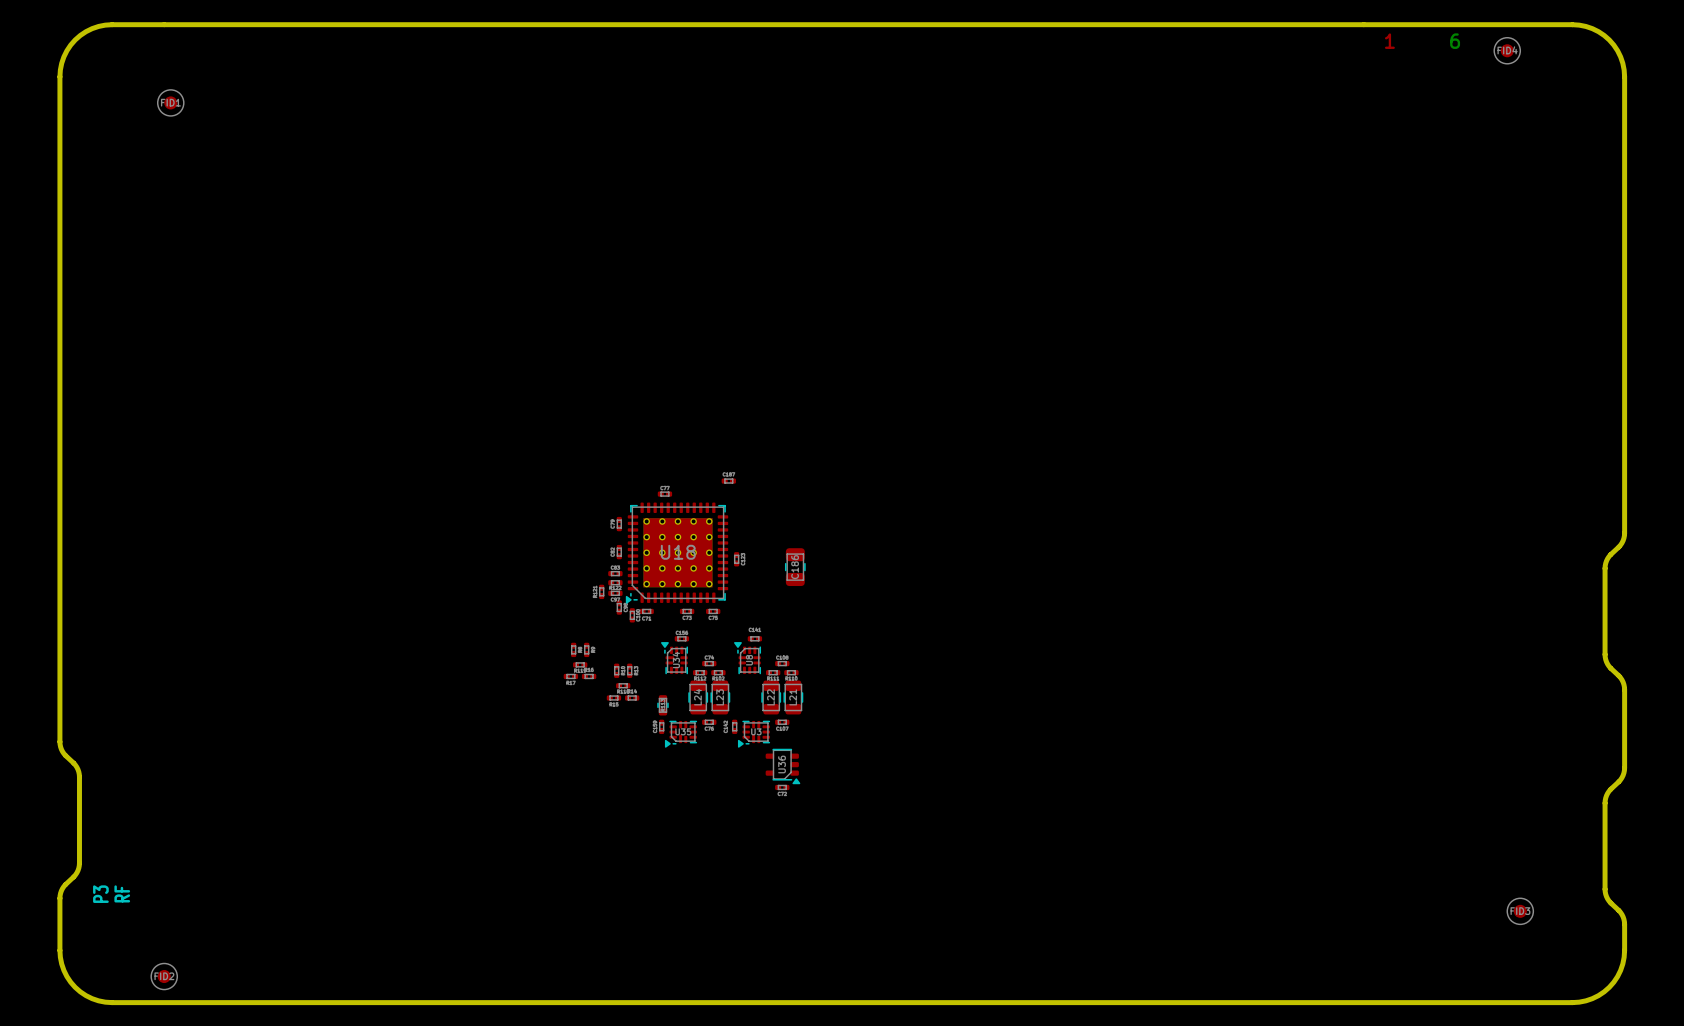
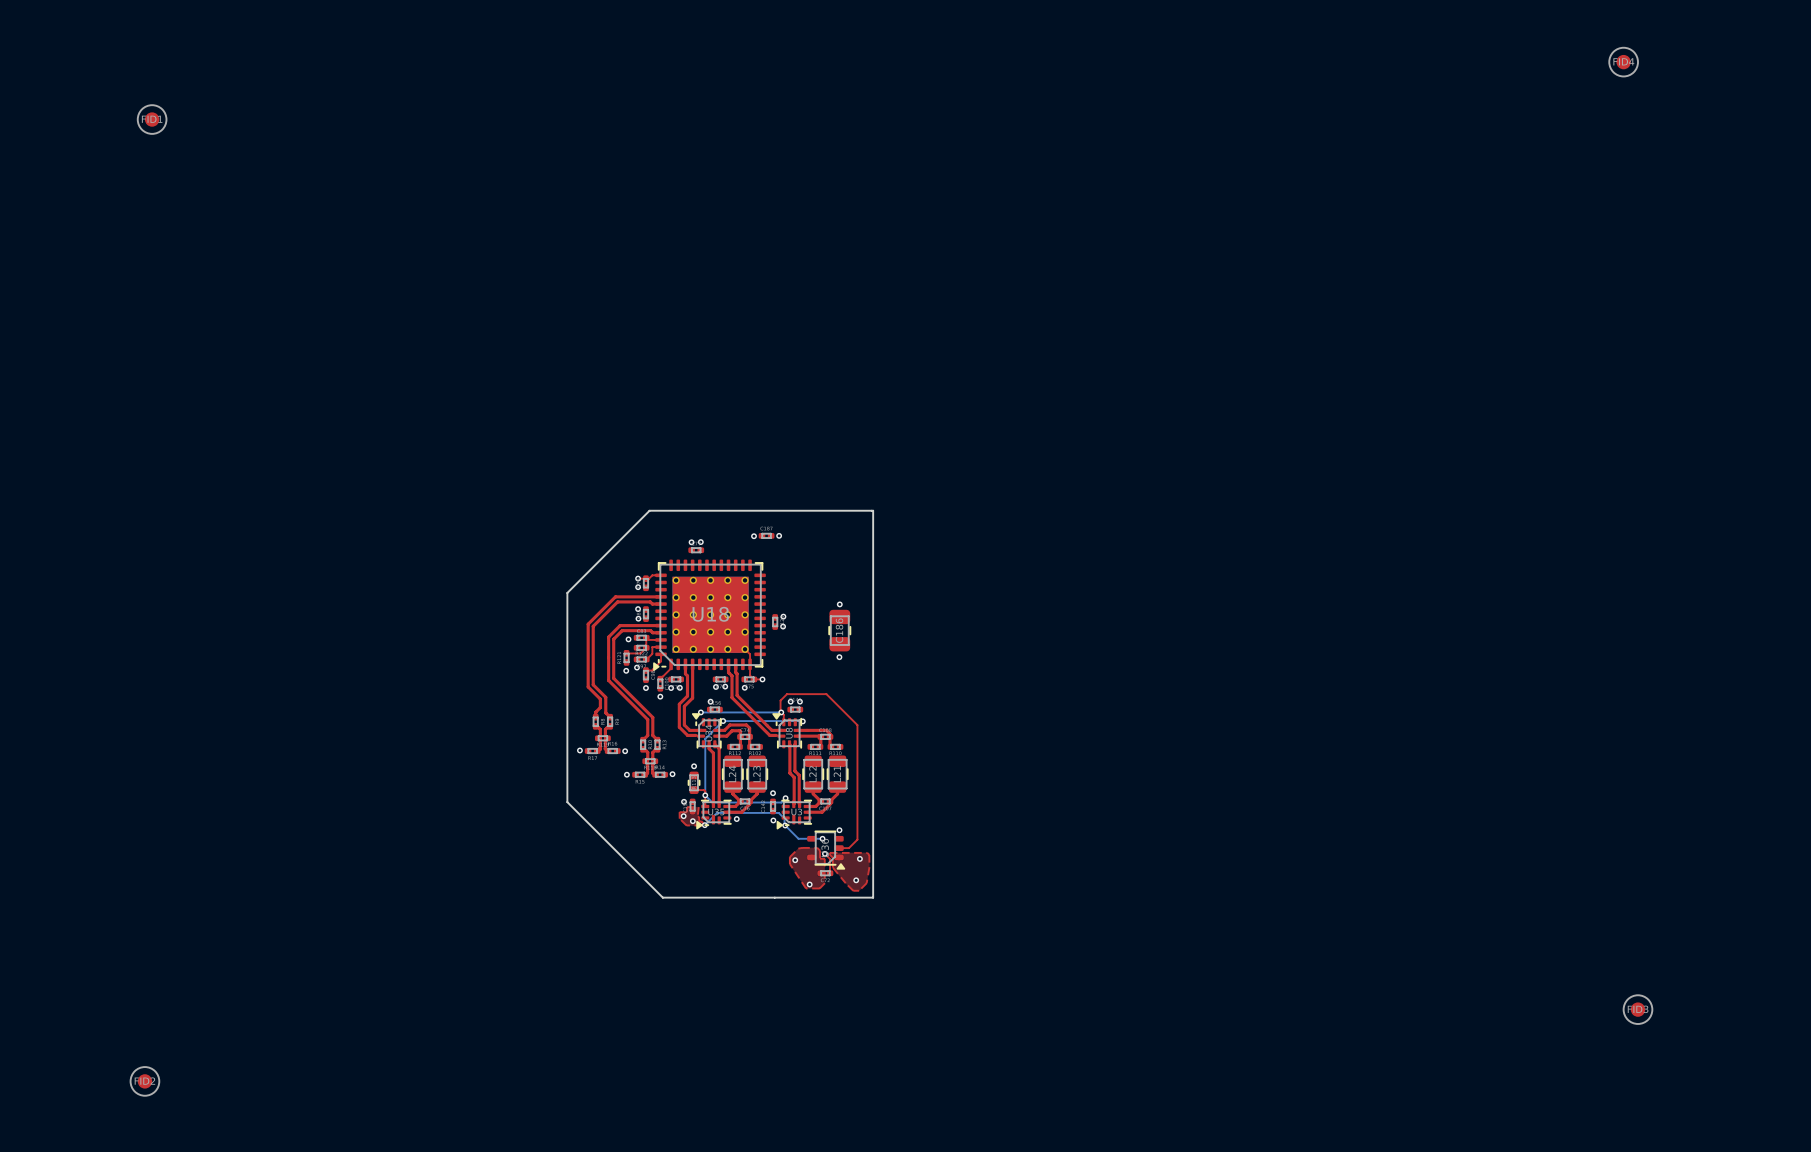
board edge: (112, 24) (1572, 24) (1585, 26) (1598, 31) (1609, 39) (1617, 50) (1622, 63) (1624, 76) (1624, 533) (1621, 542) (1607, 558) (1605, 568) (1605, 657) (1609, 666) (1621, 679) (1624, 689) (1624, 770) (1620, 779) (1607, 793) (1605, 803) (1605, 891) (1609, 901) (1621, 914) (1624, 921) (1624, 957) (1617, 976) (1609, 987) (1598, 995) (1585, 1000) (1572, 1002) (112, 1002) (98, 1000) (86, 995) (75, 987) (66, 976) (61, 963) (59, 950) (60, 893) (63, 886) (76, 872) (79, 863) (79, 774) (75, 765) (62, 751) (59, 741) (59, 76) (63, 56) (75, 39) (92, 28) (112, 24) -> none
text: 1 (1389, 41) -> none
text: 6 (1455, 41) -> none
board edge: none -> (649, 510) (567, 592) (567, 802) (662, 897) (873, 897) (873, 510) (649, 510)
via: none -> (754, 536)
via: none -> (779, 535)
via: none -> (691, 542)
via: none -> (700, 542)
top track: none -> (661, 575) (652, 575) (649, 578) (638, 578)
via: none -> (638, 578)
via: none -> (638, 587)
top track: none -> (661, 596) (615, 596) (588, 624) (588, 686) (600, 699) (600, 707) (595, 712) (595, 717)
top track: none -> (661, 604) (652, 604) (650, 601) (617, 601) (593, 626) (593, 684) (605, 697) (605, 712) (610, 717)
via: none -> (839, 604)
via: none -> (638, 609)
via: none -> (783, 616)
via: none -> (638, 618)
top track: none -> (661, 625) (620, 625) (608, 637) (608, 680) (647, 719) (647, 735) (643, 740)
via: none -> (783, 626)
top track: none -> (661, 632) (652, 632) (650, 630) (622, 630) (613, 639) (613, 678) (652, 717) (652, 735) (657, 740)
via: none -> (628, 639)
top track: none -> (661, 639) (648, 639) (646, 637) (646, 647) (640, 653) (626, 653)
top track: none -> (661, 647) (652, 647) (652, 653) (646, 659)
top track: none -> (745, 649) (750, 654) (750, 675) (753, 679) (762, 679)
top track: none -> (661, 654) (661, 661) (653, 669) (645, 670)
via: none -> (839, 657)
top track: none -> (671, 664) (671, 668) (660, 679)
top track: none -> (685, 664) (687, 696) (679, 704) (679, 727) (687, 735) (695, 735)
top track: none -> (692, 664) (692, 698) (684, 706) (684, 725) (689, 730) (701, 730)
top track: none -> (728, 664) (728, 672) (732, 675) (732, 697) (769, 735) (776, 735)
top track: none -> (735, 664) (737, 695) (767, 725)
via: none -> (637, 667)
via: none -> (626, 670)
via: none -> (762, 679)
via: none -> (725, 686)
via: none -> (715, 686)
via: none -> (645, 688)
via: none -> (671, 688)
via: none -> (679, 687)
via: none -> (744, 687)
via: none -> (660, 696)
via: none -> (710, 701)
via: none -> (790, 701)
via: none -> (799, 701)
bottom track: none -> (700, 712) (781, 712)
via: none -> (700, 712)
via: none -> (781, 712)
via: none -> (723, 721)
bottom track: none -> (802, 721) (723, 721) (705, 738) (705, 795) (712, 802) (781, 802) (785, 798)
via: none -> (802, 721)
top track: none -> (783, 722) (783, 714) (780, 711) (780, 700) (787, 694) (826, 694) (857, 725) (857, 839) (848, 848) (839, 848)
top track: none -> (767, 725) (771, 730) (782, 730)
top track: none -> (595, 726) (600, 729) (600, 736) (598, 738) (600, 739) (600, 749) (597, 751)
top track: none -> (610, 726) (605, 729) (605, 736) (607, 738) (605, 739) (605, 748) (608, 751)
top track: none -> (717, 730) (724, 730) (729, 725) (746, 725) (749, 728) (750, 746)
top track: none -> (797, 730) (826, 730) (830, 733) (830, 746)
top track: none -> (717, 736) (726, 736) (732, 730) (739, 730) (739, 746)
top track: none -> (797, 736) (820, 736) (819, 746)
top track: none -> (709, 744) (709, 748) (713, 753) (713, 804)
top track: none -> (714, 744) (719, 748) (719, 804)
top track: none -> (789, 744) (789, 773) (794, 777) (793, 804)
top track: none -> (795, 744) (794, 770) (799, 775) (799, 804)
top track: none -> (643, 749) (647, 752) (647, 759) (645, 761) (647, 763) (647, 773) (644, 774)
top track: none -> (657, 749) (652, 752) (652, 759) (654, 761) (652, 762) (652, 773) (655, 774)
via: none -> (579, 750)
via: none -> (625, 751)
via: none -> (694, 766)
via: none -> (626, 774)
via: none -> (672, 774)
top track: none -> (732, 787) (732, 793) (740, 801) (735, 806) (727, 806)
top track: none -> (757, 787) (757, 793) (741, 812) (727, 812)
top track: none -> (813, 787) (813, 793) (820, 801) (815, 806) (807, 806)
top track: none -> (837, 787) (837, 793) (822, 812) (807, 812)
top track: none -> (694, 790) (705, 791) (705, 806)
via: none -> (773, 793)
via: none -> (705, 795)
via: none -> (785, 798)
via: none -> (684, 801)
via: none -> (683, 816)
via: none -> (736, 819)
top zone outline: none -> (699, 820) (698, 807) (687, 807) (687, 812) (679, 812) (679, 818) (686, 825) (702, 825) (702, 821) (699, 820)
via: none -> (773, 820)
via: none -> (692, 821)
bottom track: none -> (704, 825) (717, 812) (778, 812) (784, 818) (784, 824) (798, 838) (822, 838)
via: none -> (704, 825)
via: none -> (785, 825)
via: none -> (839, 830)
via: none -> (822, 838)
top zone outline: none -> (802, 847) (817, 847) (820, 850) (820, 858) (824, 858) (824, 883) (819, 888) (806, 888) (789, 864) (789, 857) (798, 848) (802, 847)
top track: none -> (824, 853) (830, 858) (830, 873)
via: none -> (824, 853)
top zone outline: none -> (829, 852) (832, 857) (832, 867) (853, 890) (859, 890) (866, 883) (869, 854) (867, 852) (829, 852)
via: none -> (859, 858)
via: none -> (795, 860)
via: none -> (856, 880)
via: none -> (809, 884)
text: RF (122, 893) -> none
text: P3 (100, 894) -> none

